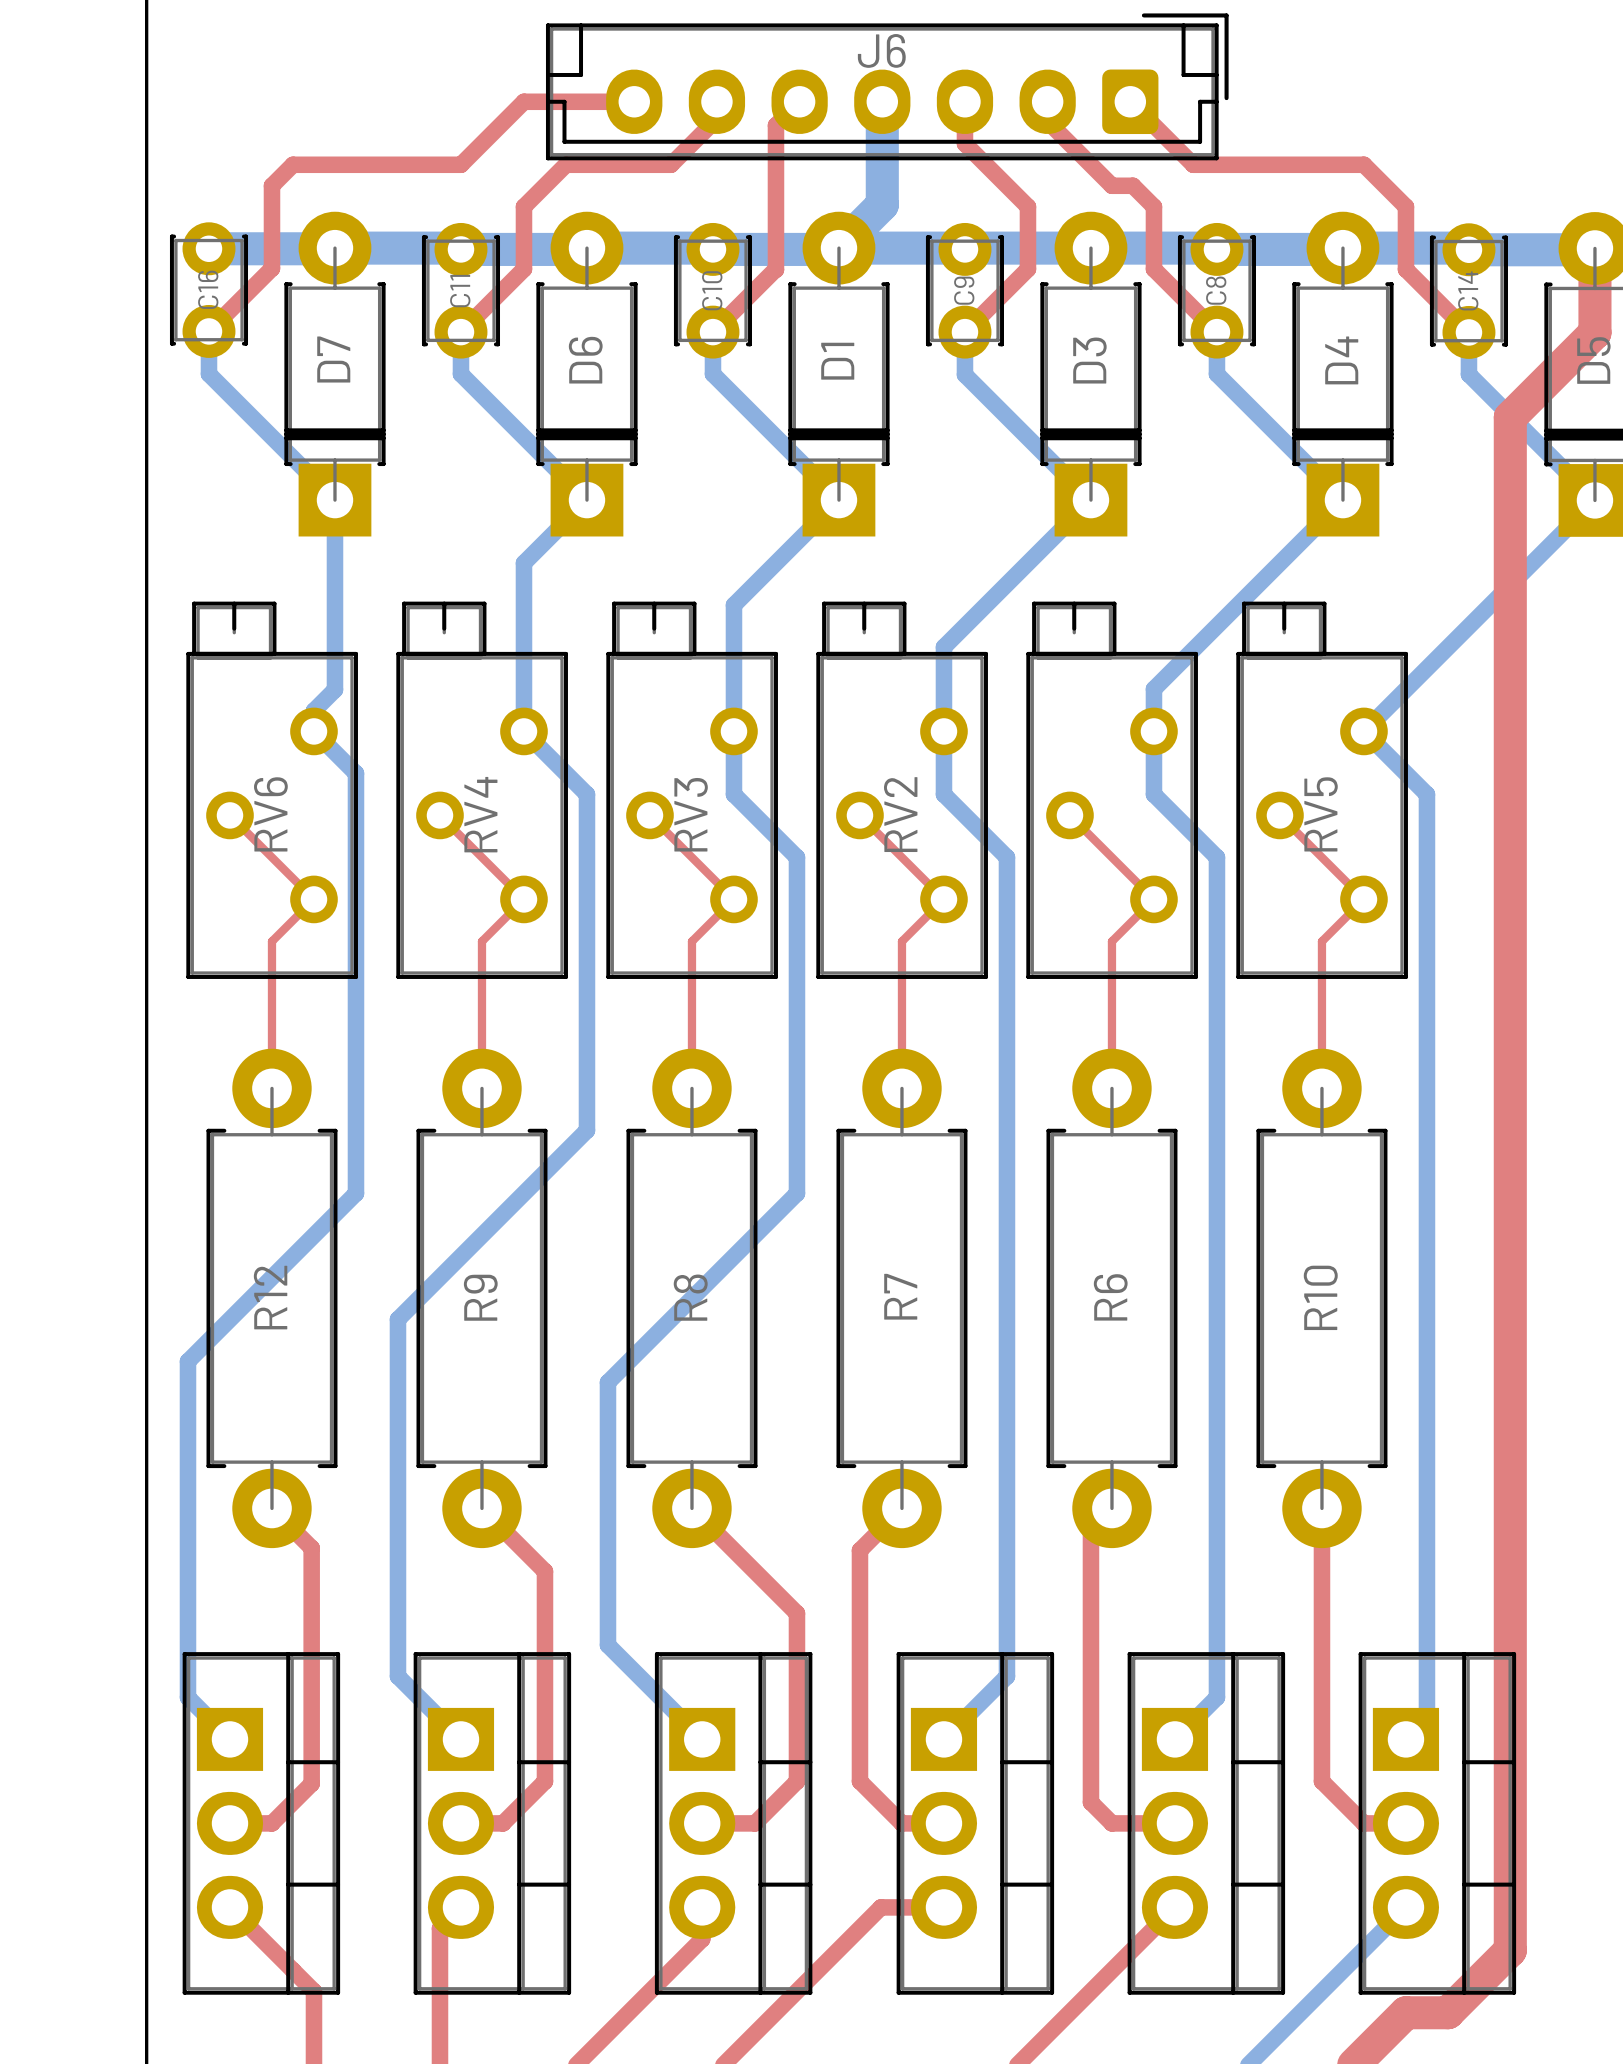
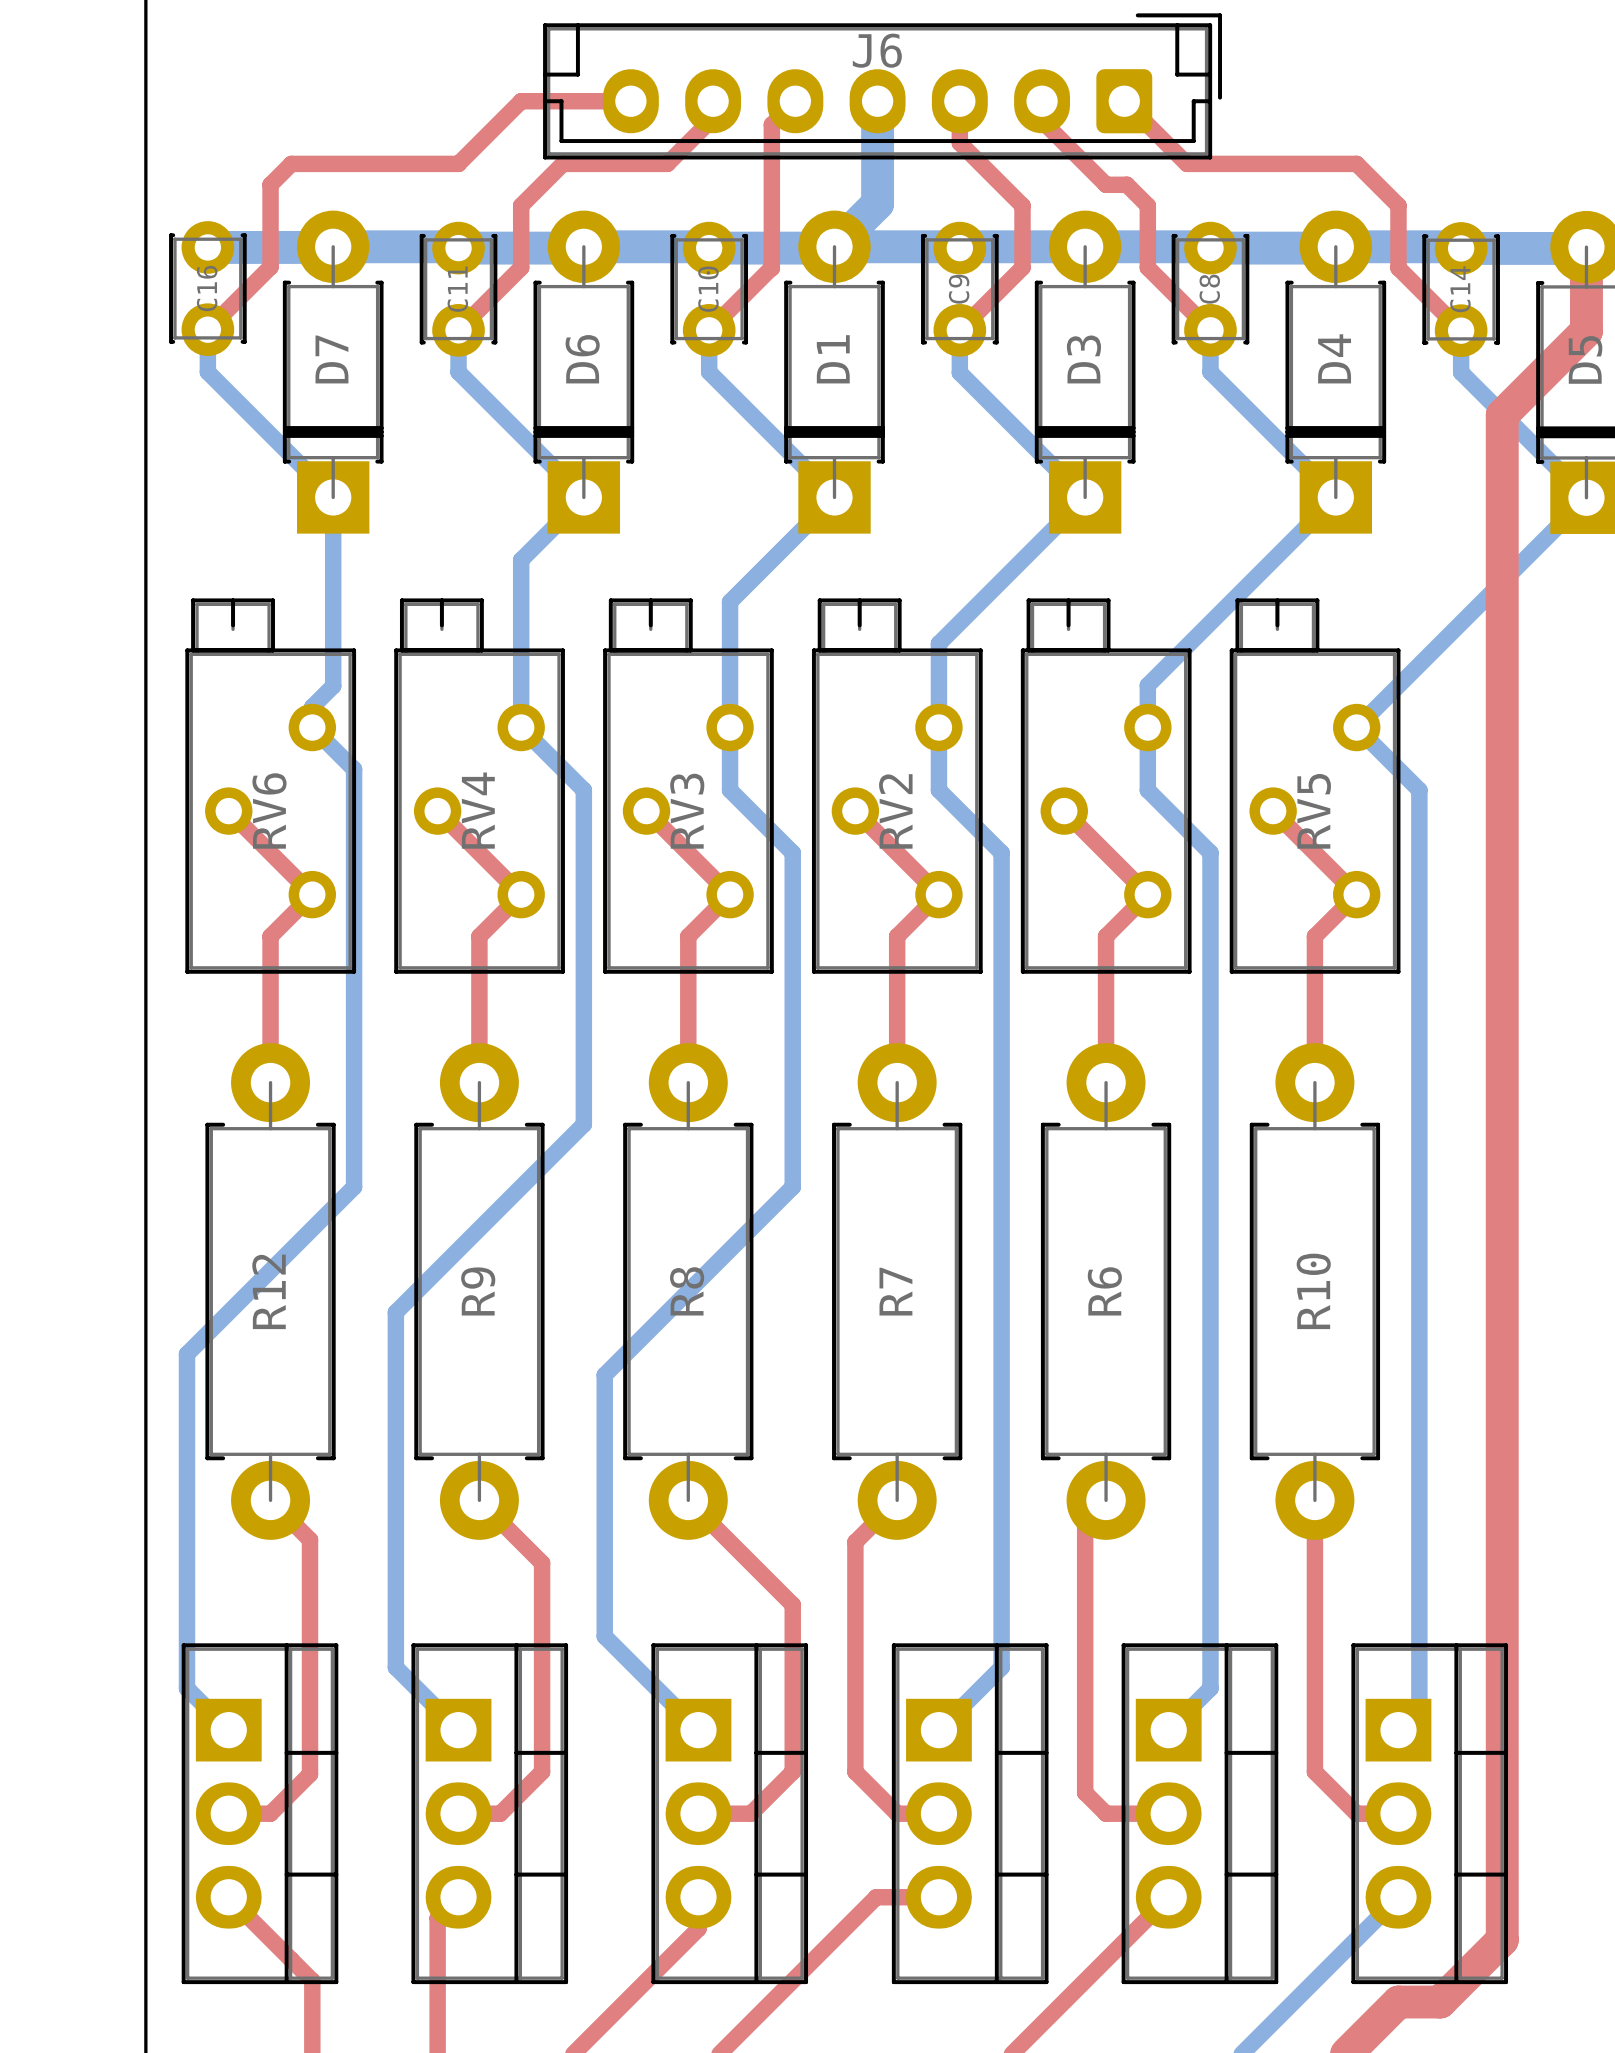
top track width: thin (229, 815) (313, 899) (271, 941) (271, 1088) -> thick (228, 811) (312, 894) (270, 936) (270, 1082)
top track width: thin (439, 815) (523, 899) (481, 941) (481, 1088) -> thick (437, 811) (521, 894) (479, 936) (479, 1082)
top track width: thin (649, 815) (733, 899) (691, 941) (691, 1088) -> thick (646, 811) (730, 894) (688, 936) (688, 1082)
top track width: thin (859, 815) (943, 899) (901, 941) (901, 1088) -> thick (855, 811) (938, 894) (897, 936) (897, 1082)
top track width: thin (1069, 815) (1153, 899) (1111, 941) (1111, 1088) -> thick (1064, 811) (1147, 894) (1106, 936) (1106, 1082)
top track width: thin (1279, 815) (1363, 899) (1321, 941) (1321, 1088) -> thick (1273, 811) (1356, 894) (1314, 936) (1314, 1082)

